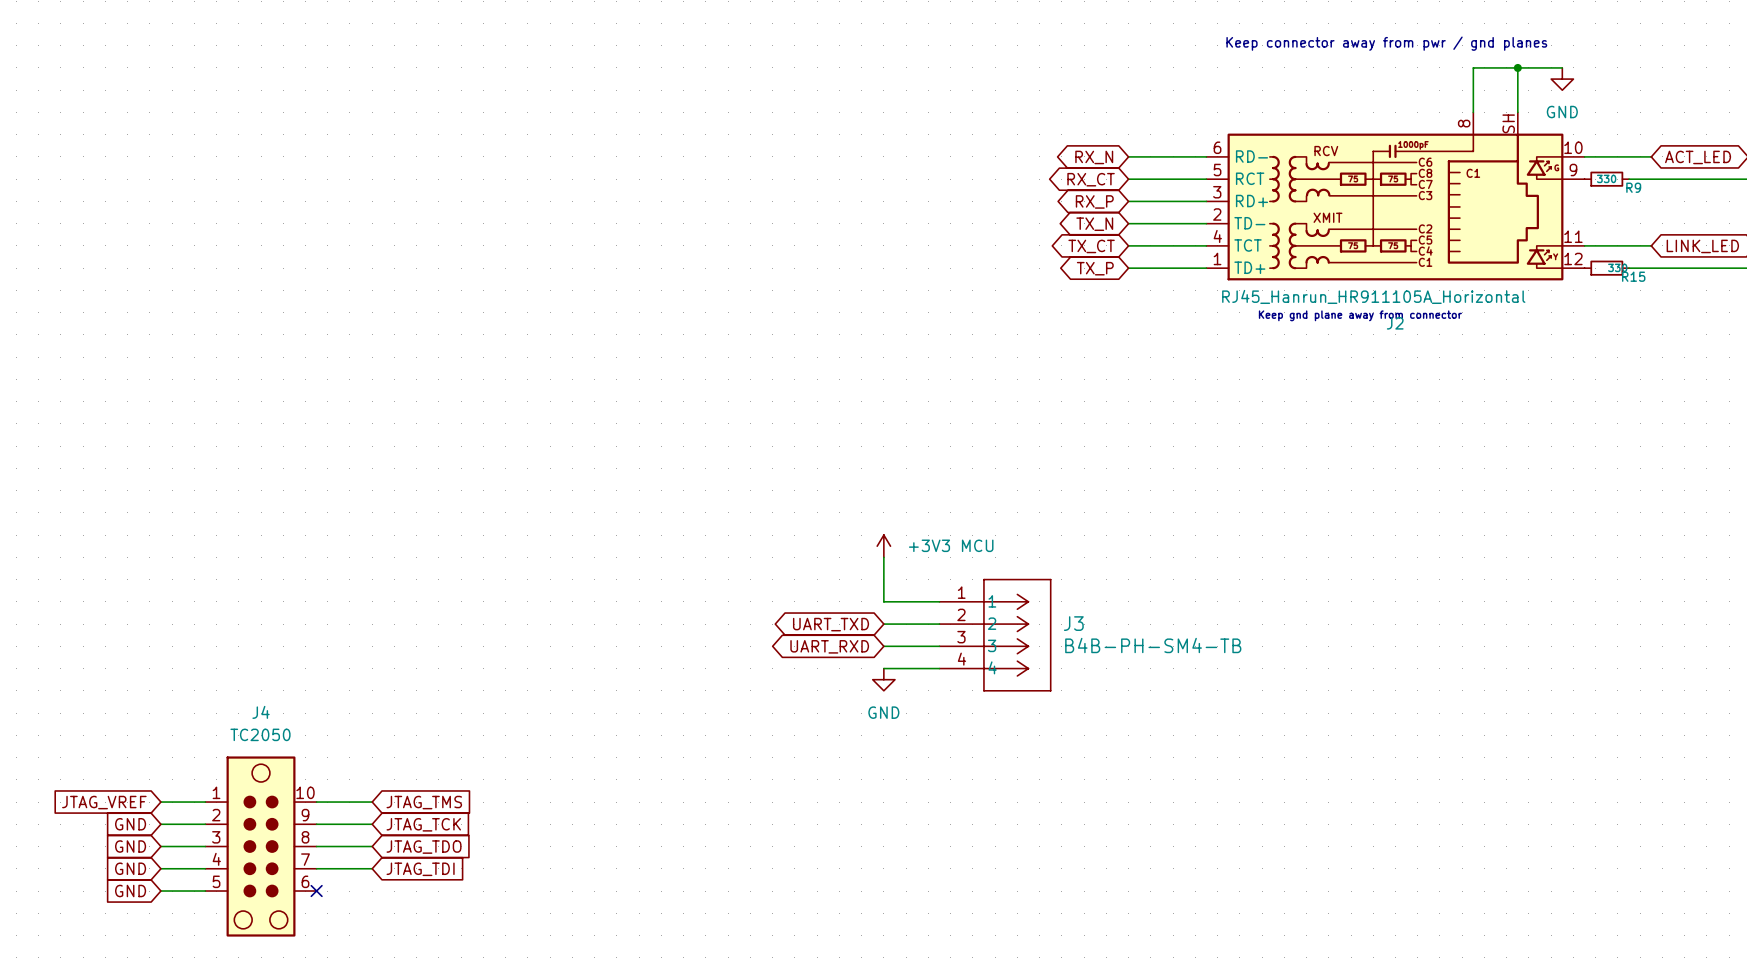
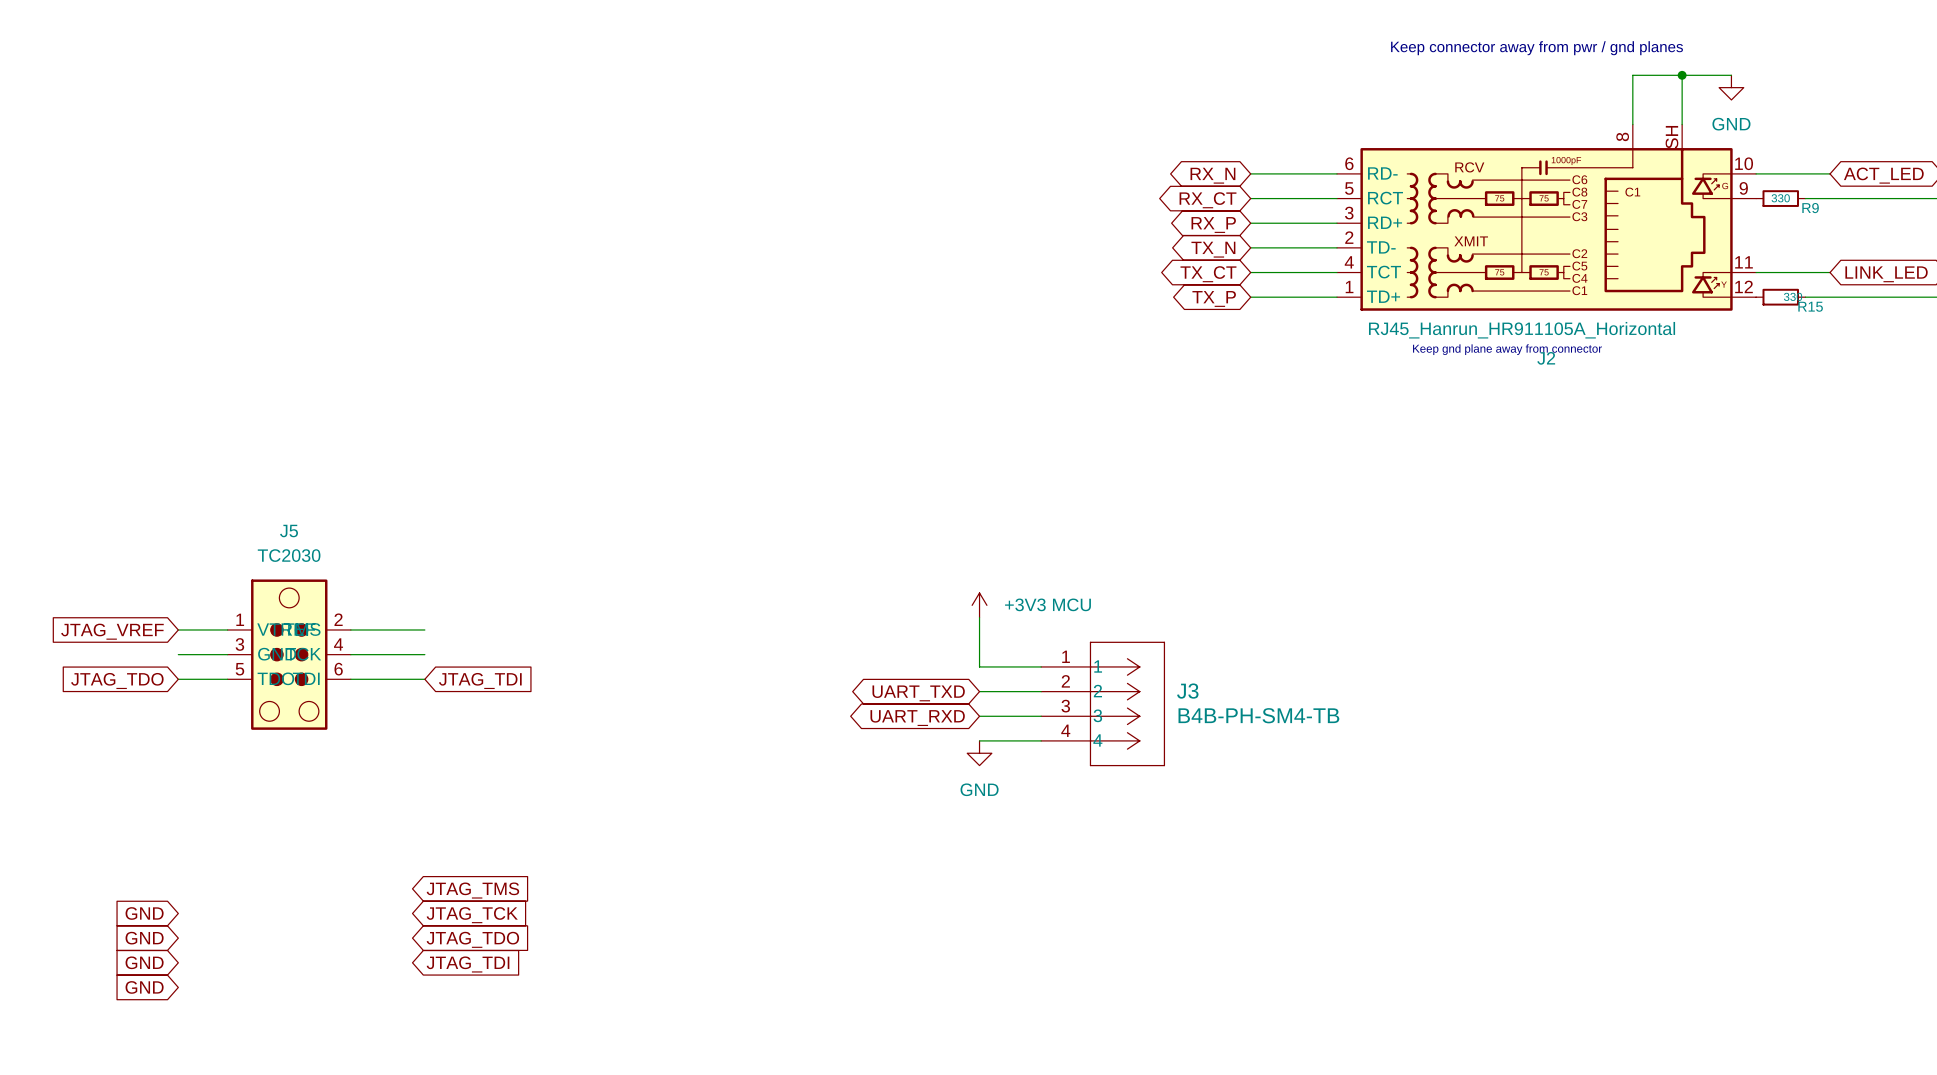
global label: none -> JTAG_VREF (112, 631)
wire: none -> (178, 629) (227, 629)
wire: none -> (350, 629) (424, 629)
J5: none -> TC2030 (289, 654)
wire: none -> (350, 654) (424, 654)
wire: none -> (350, 679) (424, 679)
global label: none -> JTAG_TDO (117, 680)
global label: none -> JTAG_TDI (480, 680)
global label: JTAG_VREF (104, 802) -> none
wire: (160, 802) (205, 802) -> (178, 654) (227, 654)
wire: (316, 802) (372, 802) -> none
wire: (160, 824) (205, 824) -> (178, 679) (227, 679)
wire: (316, 824) (372, 824) -> none
wire: (160, 846) (205, 846) -> none
J4: TC2050 (261, 846) -> none
wire: (316, 846) (372, 846) -> none
wire: (160, 868) (205, 868) -> none
wire: (316, 868) (372, 868) -> none
wire: (160, 891) (205, 891) -> none
no-connect mark: (316, 891) -> none

